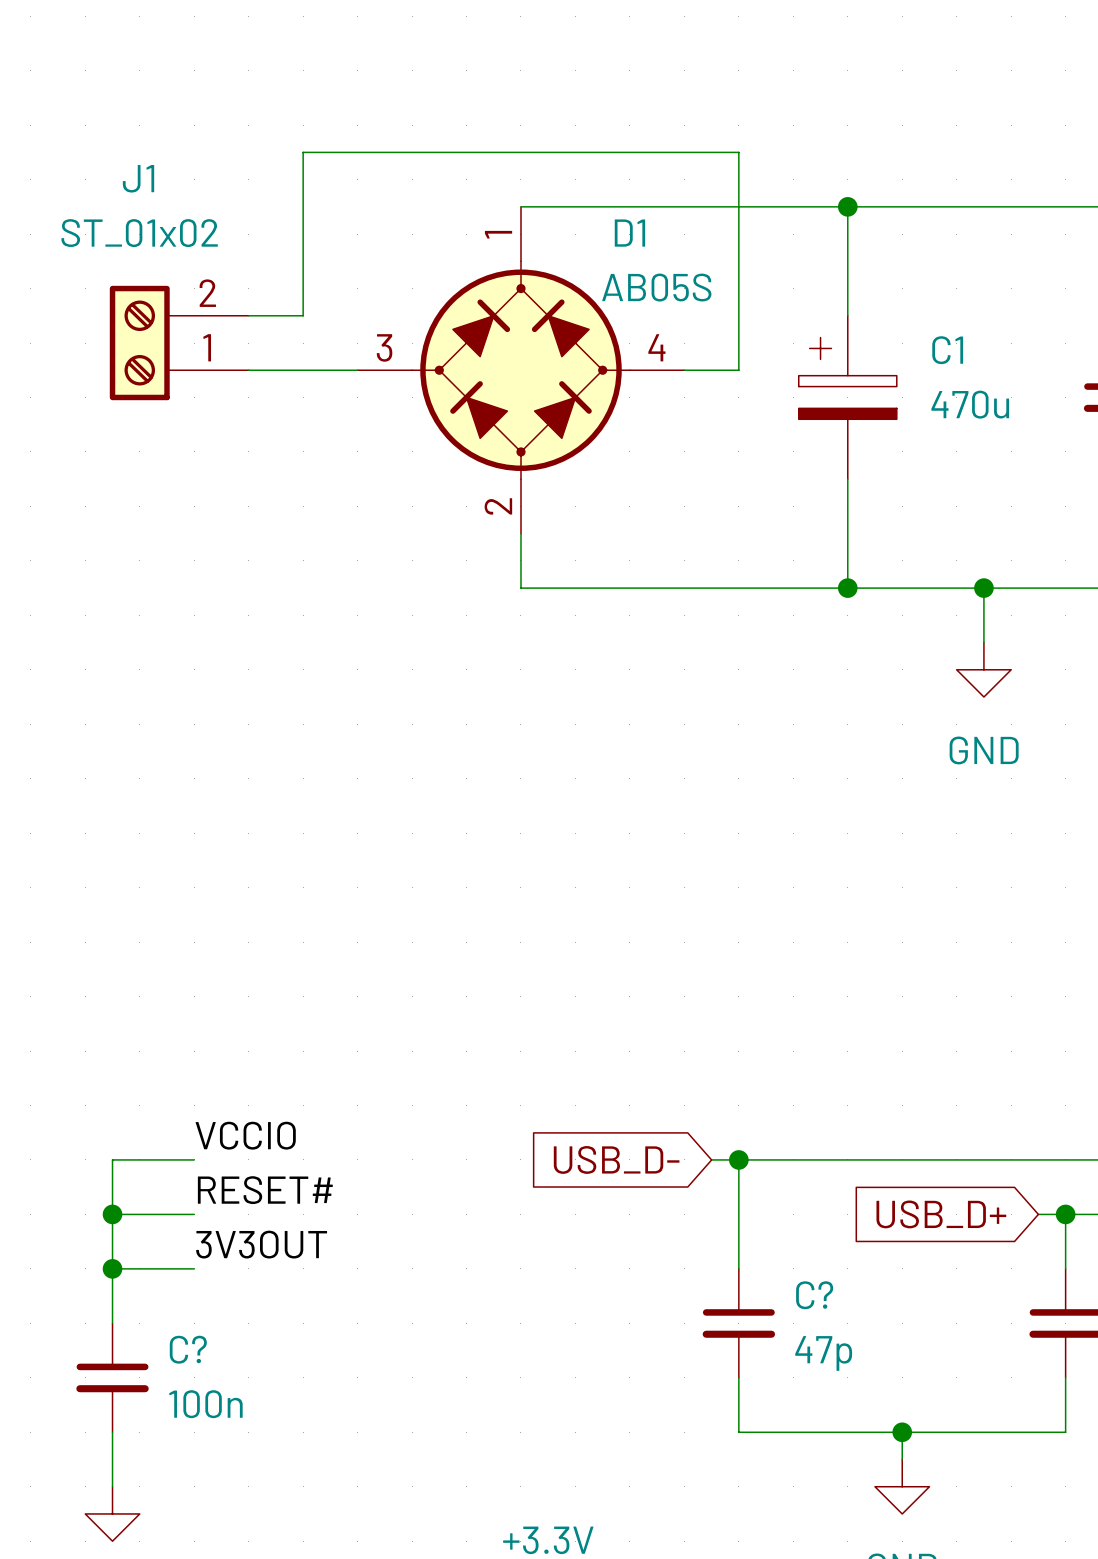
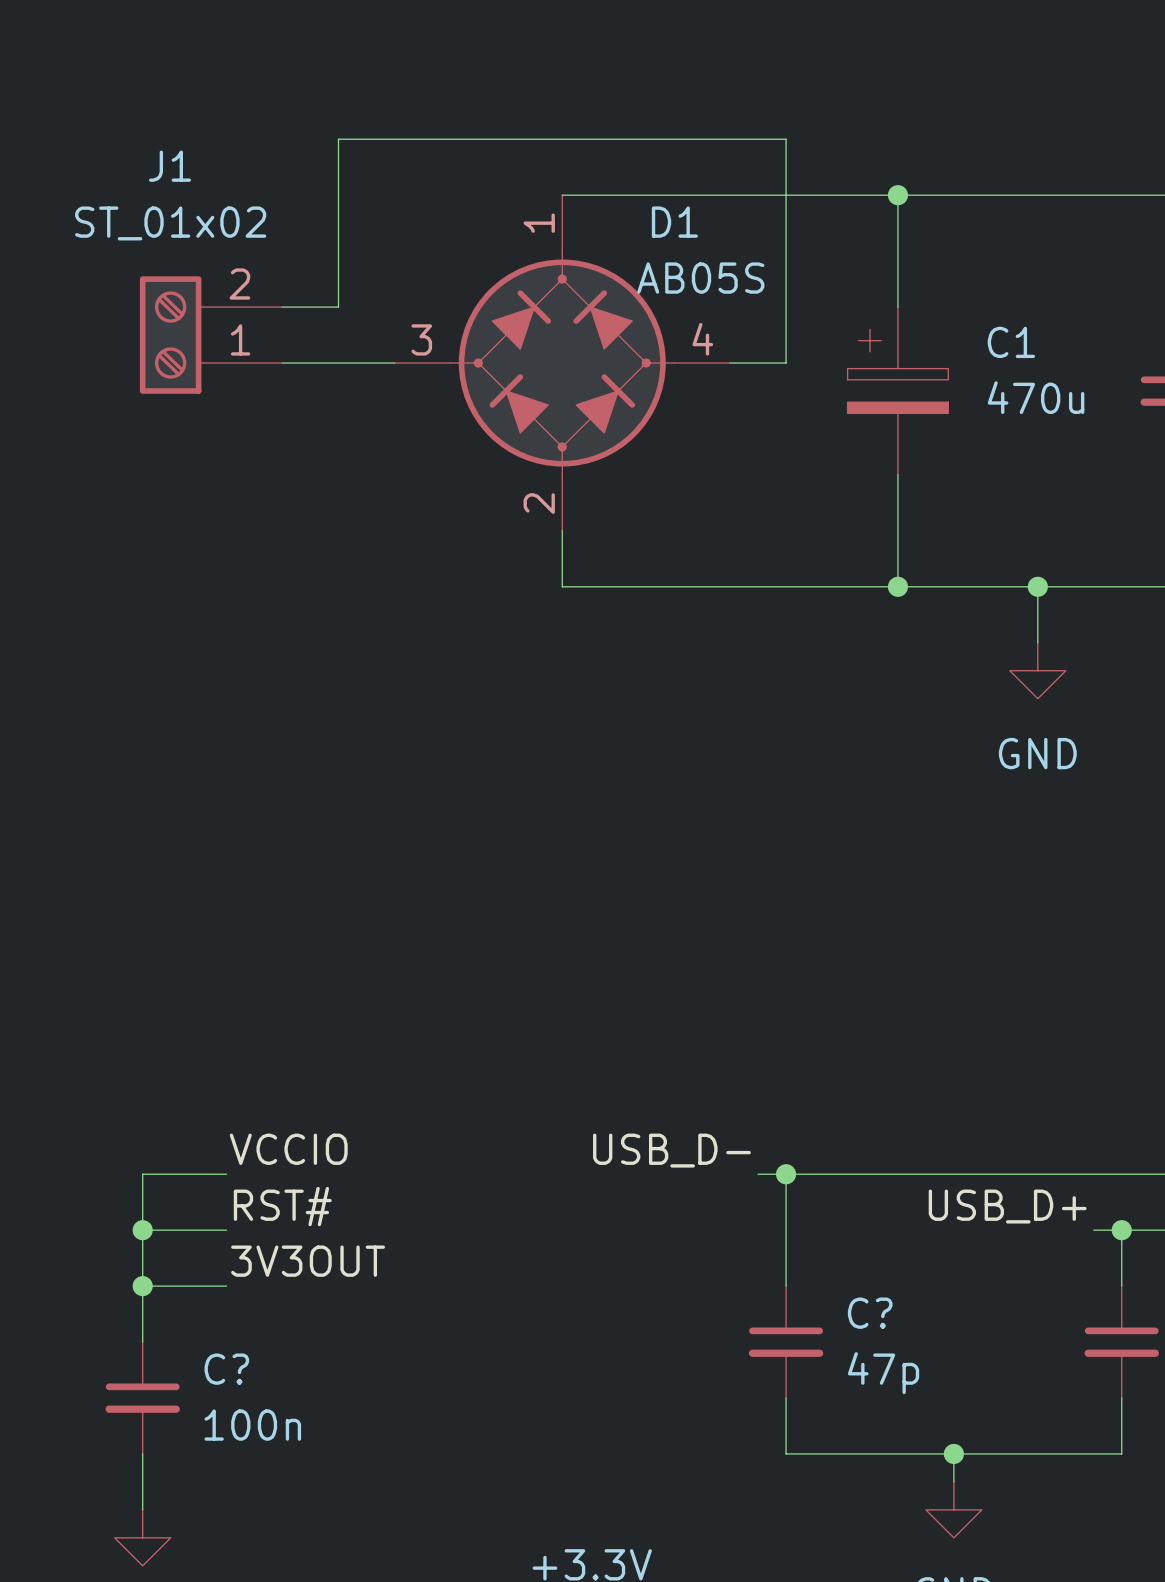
label: none -> USB_D- (671, 1150)
global label: USB_D- (616, 1159) -> none
label: RESET# (265, 1190) -> RST# (282, 1206)
label: none -> USB_D+ (1007, 1206)
global label: USB_D+ (941, 1214) -> none

